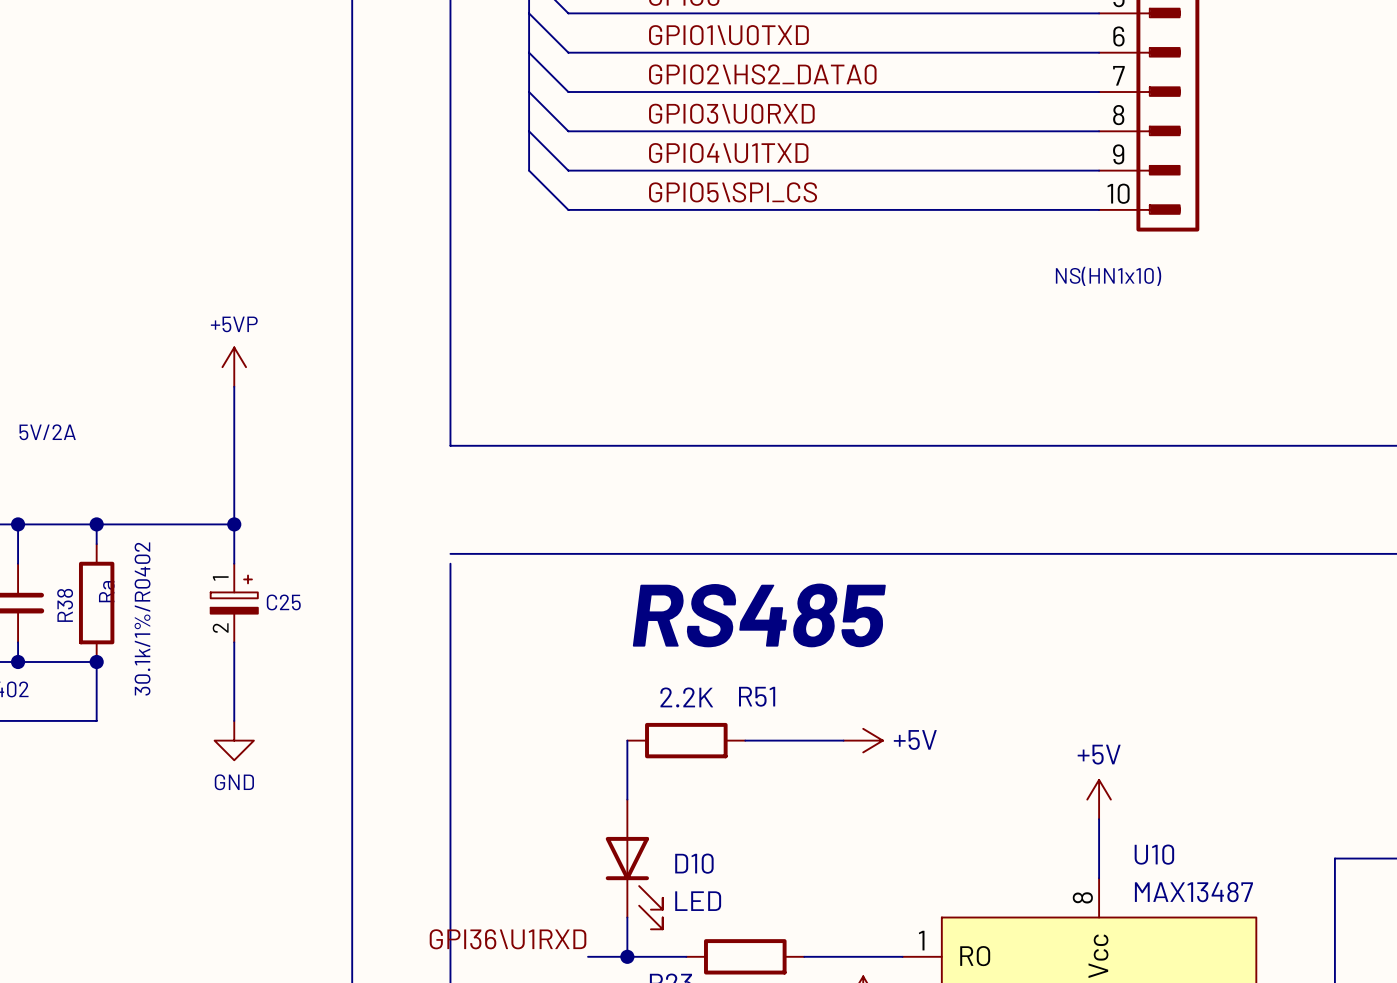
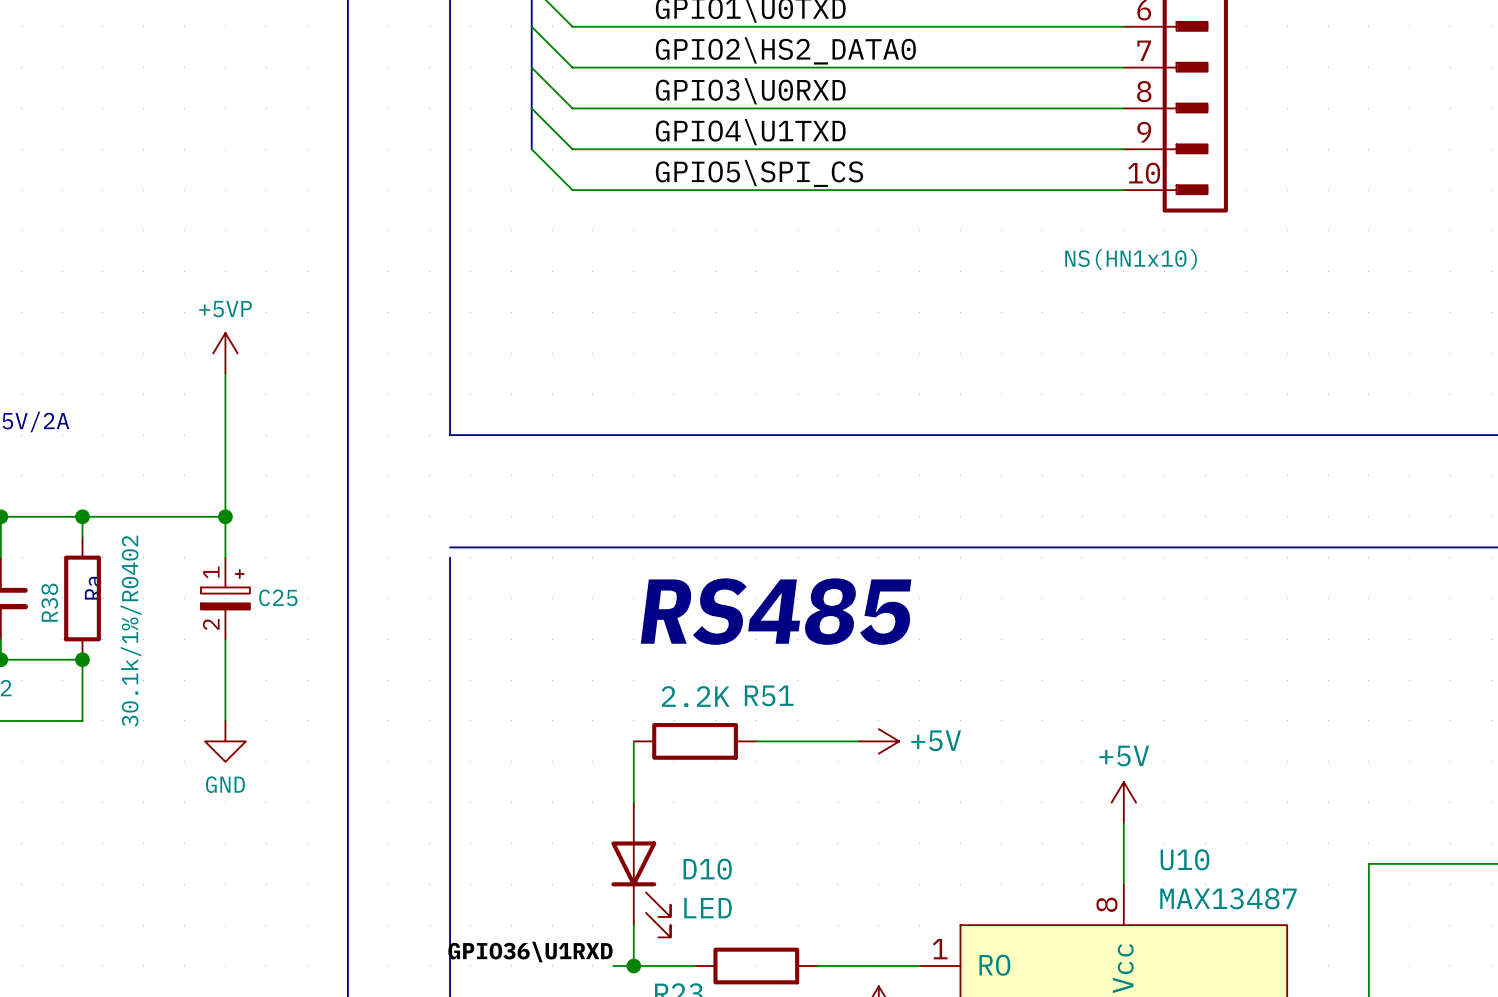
label: GPI36\U1RXD (508, 939) -> GPIO36\U1RXD (530, 952)
wire: (588, 956) (607, 956) -> none

